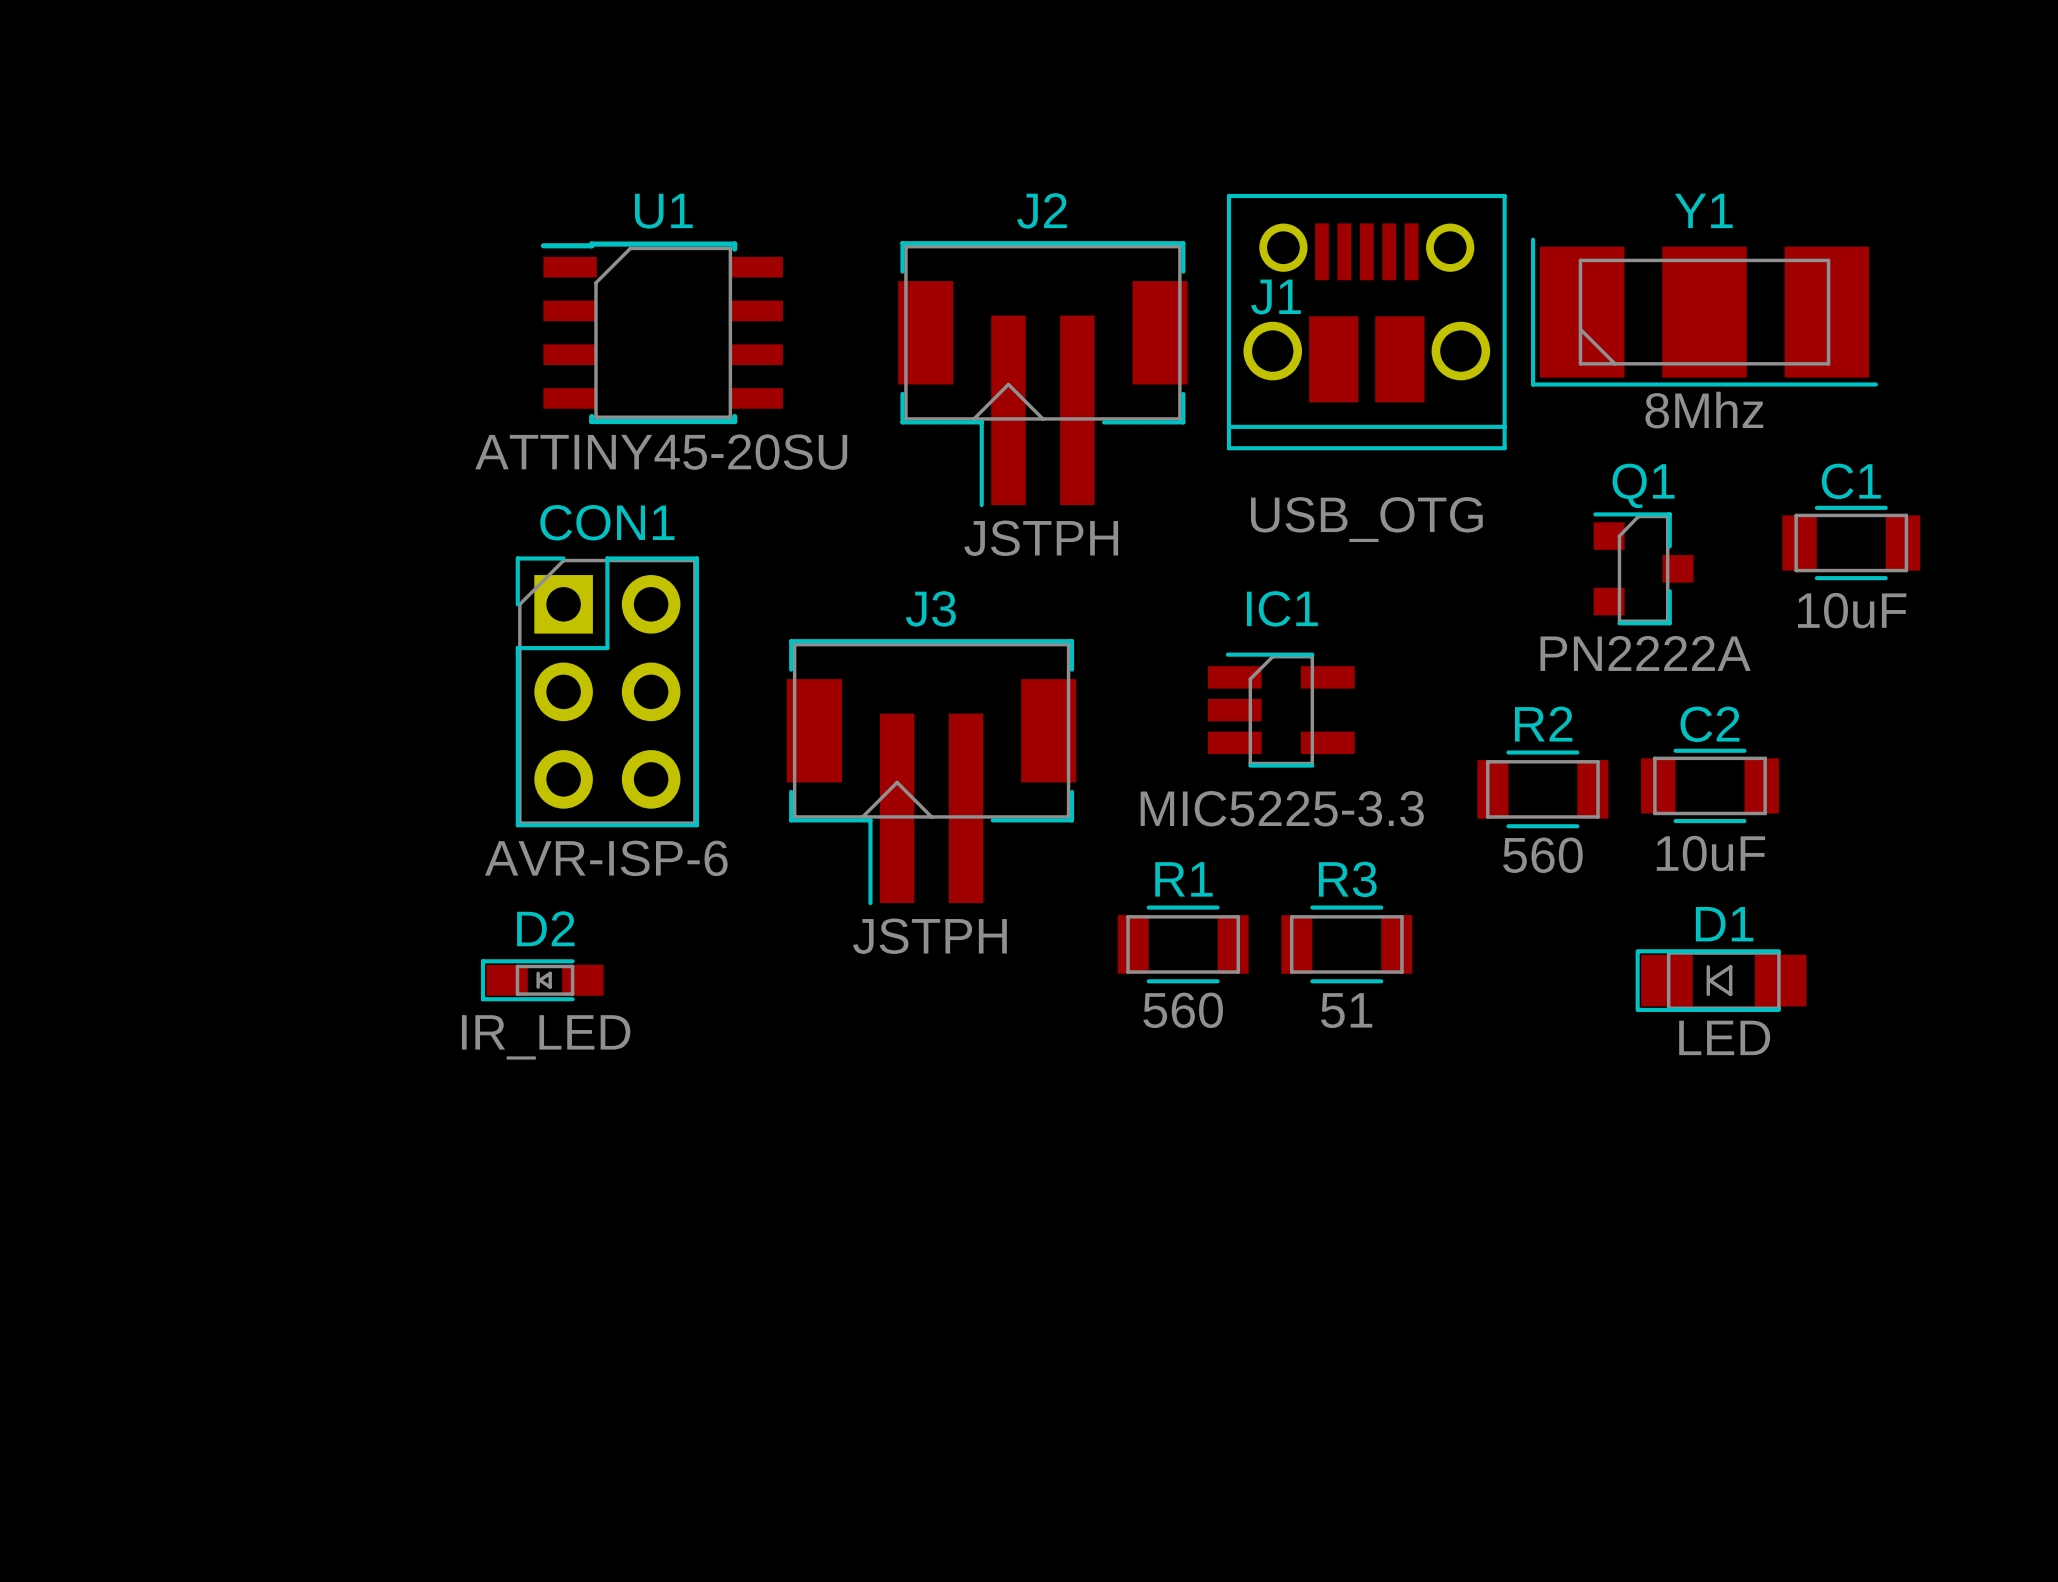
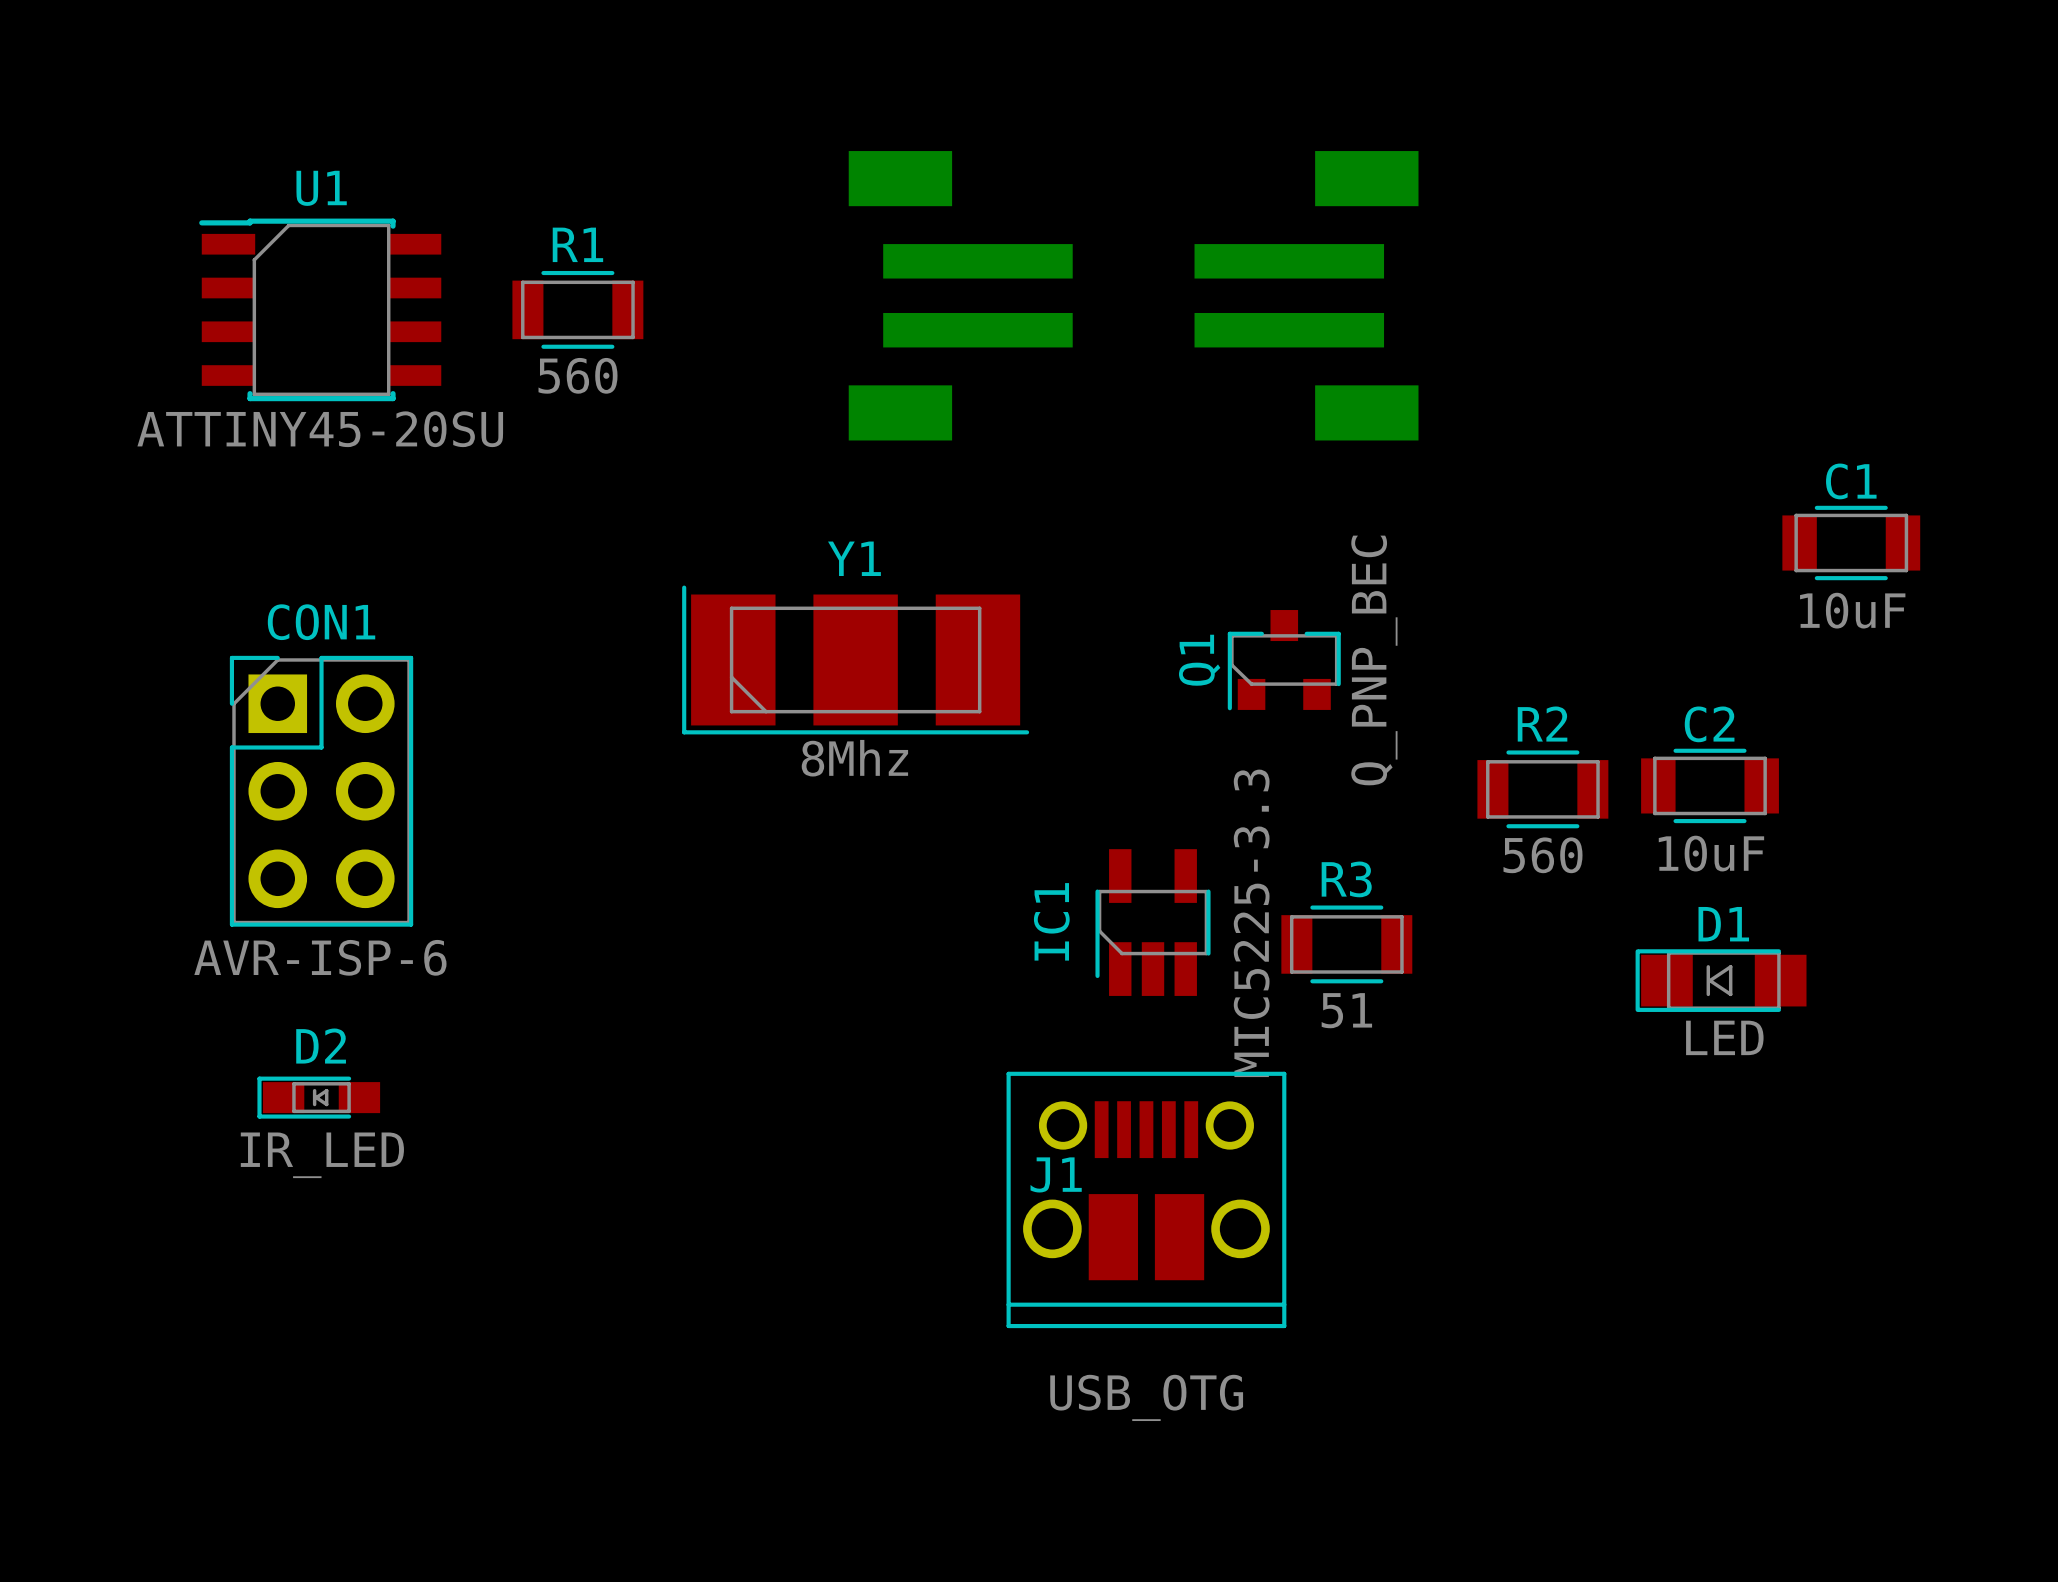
Y1 position: (1704, 312) -> (855, 659)
J1 position: (1366, 322) -> (1146, 1199)
U1 position: (661, 332) -> (320, 309)
J2 side: top (1042, 374) -> bottom (960, 295)
Q1 rotation: 0° (1643, 568) -> 90° counterclockwise (1284, 660)
Q1 position: (1643, 568) -> (1284, 660)
Q1 value: PN2222A (1645, 653) -> Q_PNP_BEC (1374, 660)
CON1 position: (607, 691) -> (321, 791)
IC1 rotation: 0° (1281, 710) -> 90° counterclockwise (1153, 922)
IC1 position: (1281, 710) -> (1153, 922)
J3 side: top (931, 772) -> bottom (1306, 295)
R1 position: (1183, 944) -> (577, 309)
D2 position: (542, 980) -> (318, 1097)

